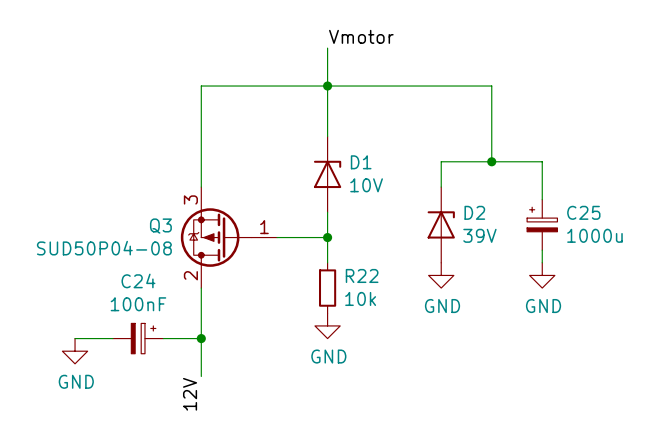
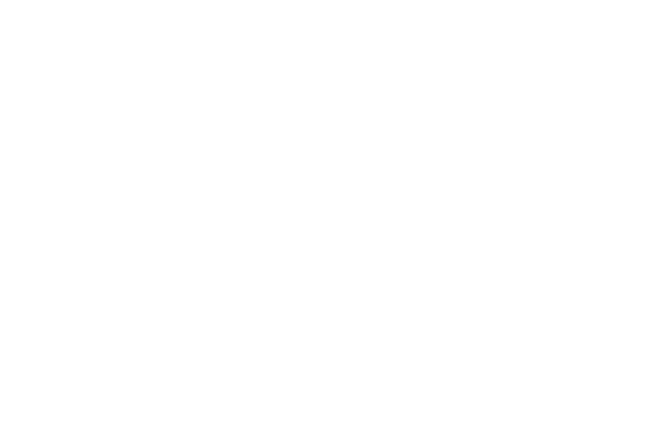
label: Vmotor (361, 36) -> none
wire: (327, 48) (327, 136) -> none
junction: (327, 86) -> none
wire: (491, 161) (491, 86) (201, 86) (201, 187) -> none
junction: (491, 161) -> none
D1: 10V (327, 174) -> none
wire: (441, 187) (441, 161) (542, 161) (542, 199) -> none
wire: (327, 212) (327, 262) -> none
D2: 39V (441, 224) -> none
C25: 1000u (542, 224) -> none
Q3: SUD50P04-08 (228, 237) -> none
wire: (277, 237) (327, 237) -> none
junction: (327, 237) -> none
wire: (542, 250) (542, 262) -> none
power symbol: GND (441, 275) -> none
power symbol: GND (542, 275) -> none
wire: (201, 288) (201, 376) -> none
R22: 10k (327, 288) -> none
power symbol: GND (327, 325) -> none
wire: (75, 338) (112, 338) -> none
C24: 100nF (138, 338) -> none
wire: (163, 338) (201, 338) -> none
junction: (201, 338) -> none
power symbol: GND (75, 351) -> none
label: 12V (190, 394) -> none

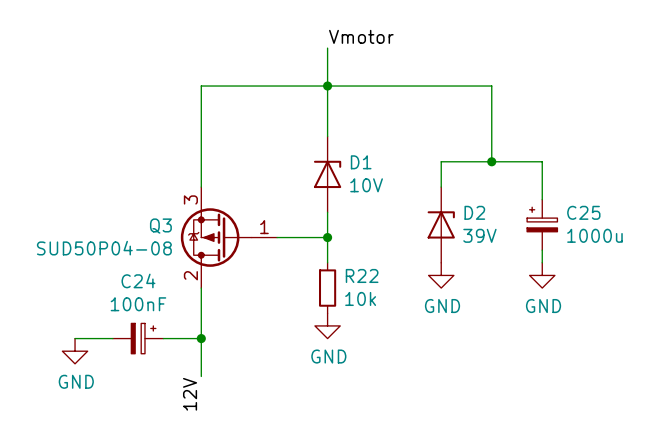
label: none -> Vmotor (361, 36)
wire: none -> (327, 48) (327, 136)
junction: none -> (327, 86)
wire: none -> (491, 161) (491, 86) (201, 86) (201, 187)
junction: none -> (491, 161)
D1: none -> 10V (327, 174)
wire: none -> (441, 187) (441, 161) (542, 161) (542, 199)
wire: none -> (327, 212) (327, 262)
D2: none -> 39V (441, 224)
C25: none -> 1000u (542, 224)
Q3: none -> SUD50P04-08 (228, 237)
wire: none -> (277, 237) (327, 237)
junction: none -> (327, 237)
wire: none -> (542, 250) (542, 262)
power symbol: none -> GND (441, 275)
power symbol: none -> GND (542, 275)
wire: none -> (201, 288) (201, 376)
R22: none -> 10k (327, 288)
power symbol: none -> GND (327, 325)
wire: none -> (75, 338) (112, 338)
C24: none -> 100nF (138, 338)
wire: none -> (163, 338) (201, 338)
junction: none -> (201, 338)
power symbol: none -> GND (75, 351)
label: none -> 12V (190, 394)

